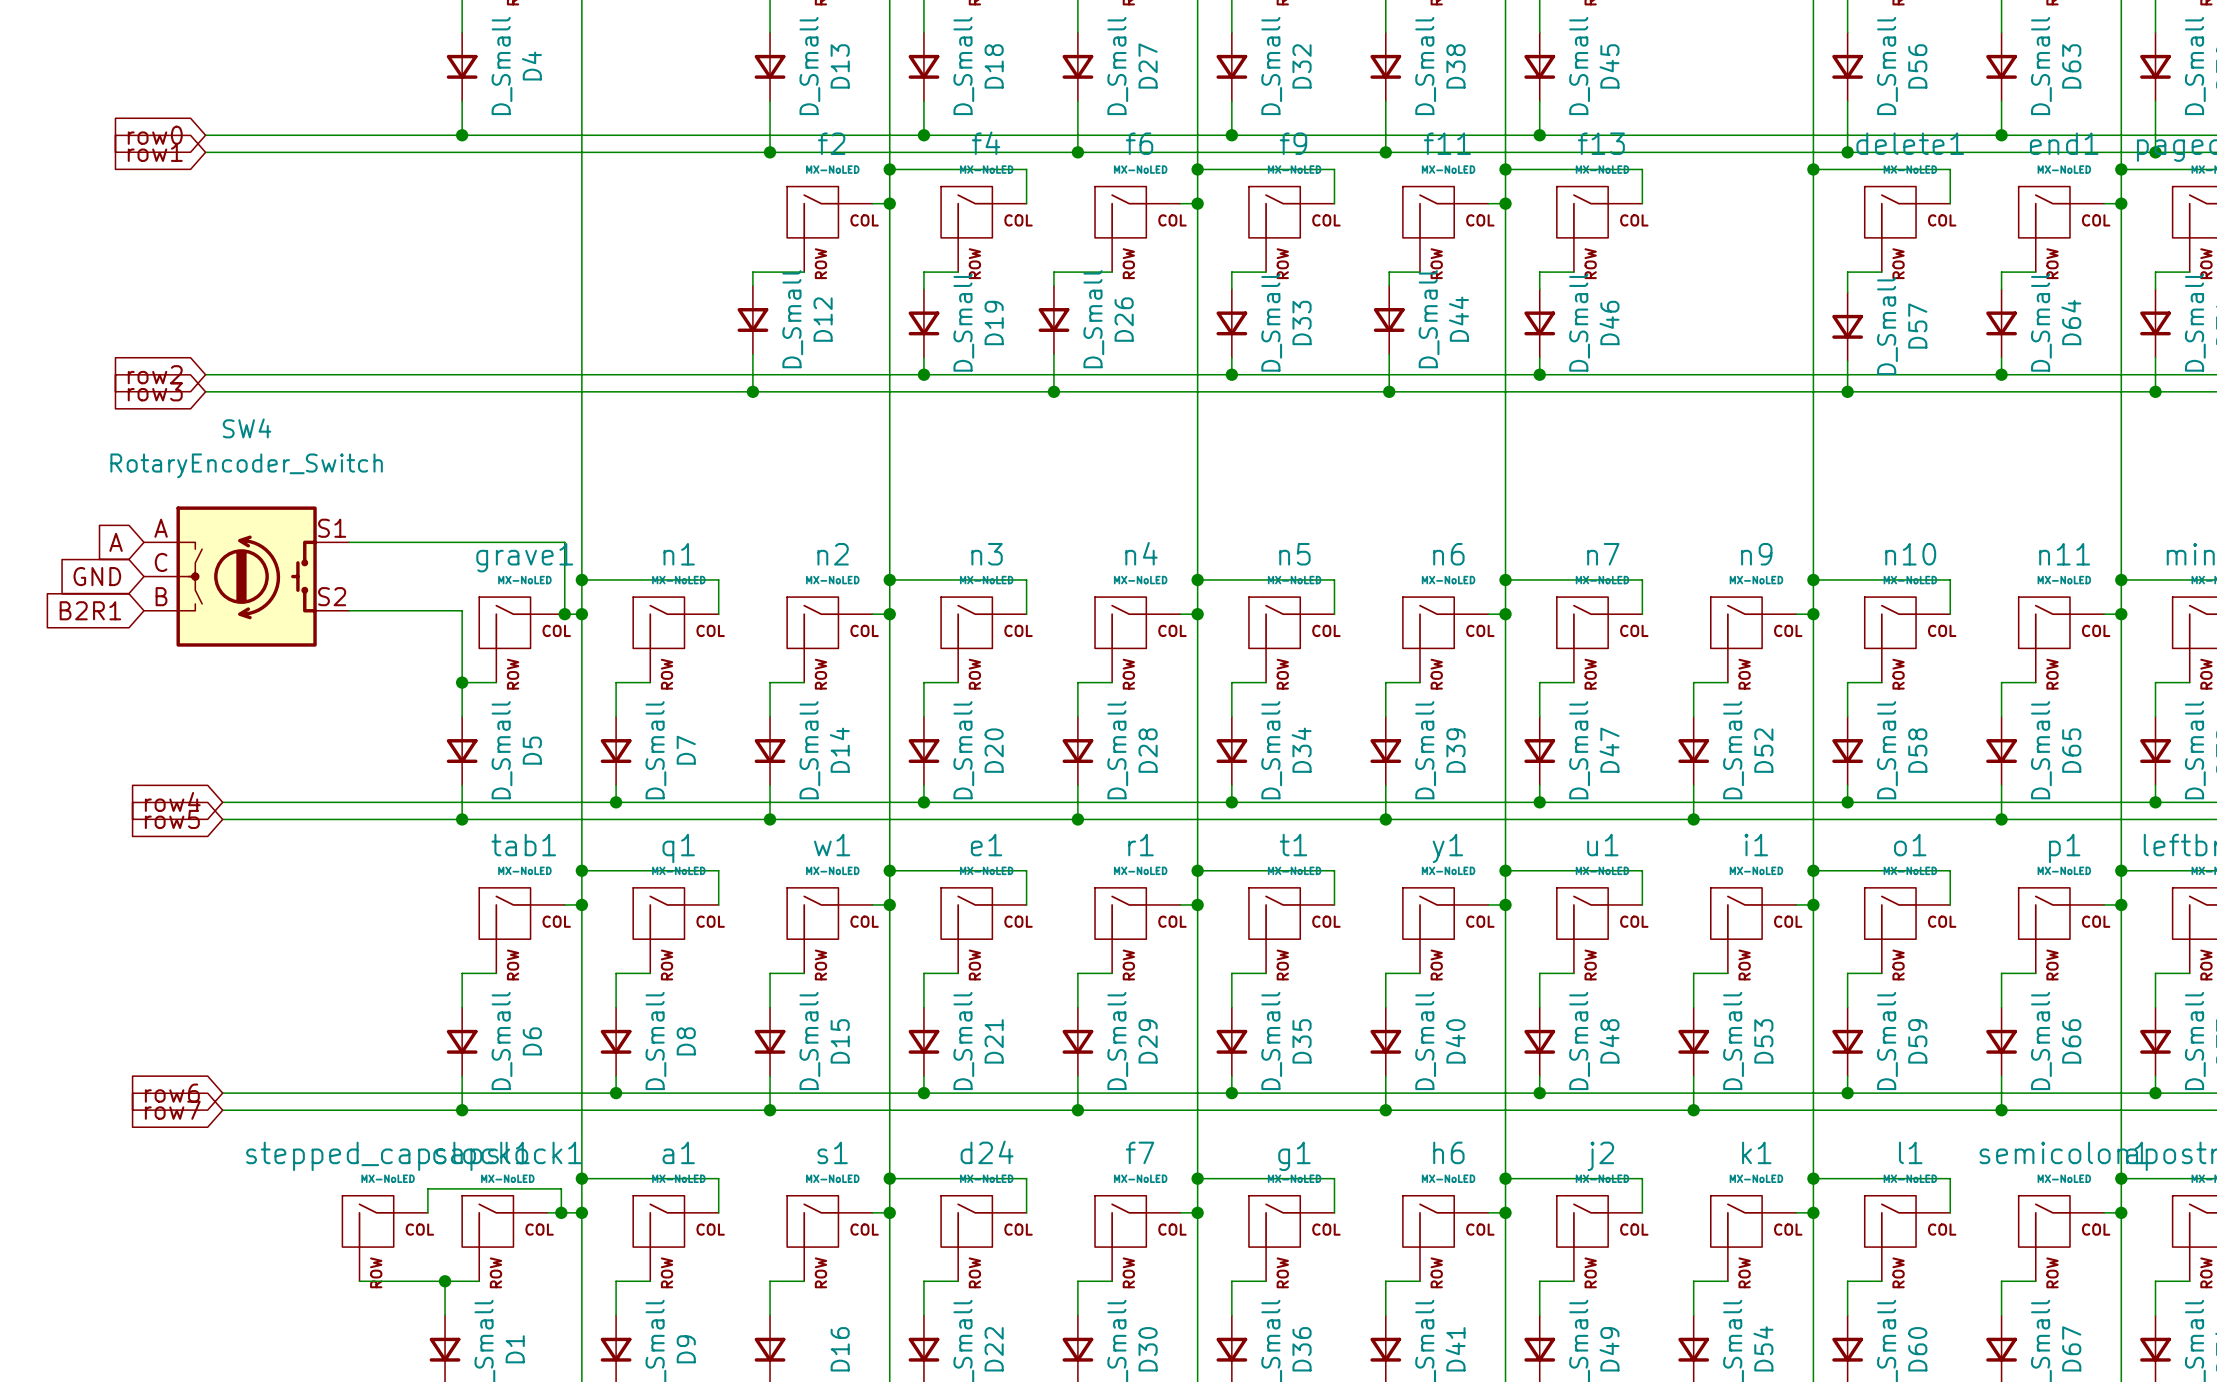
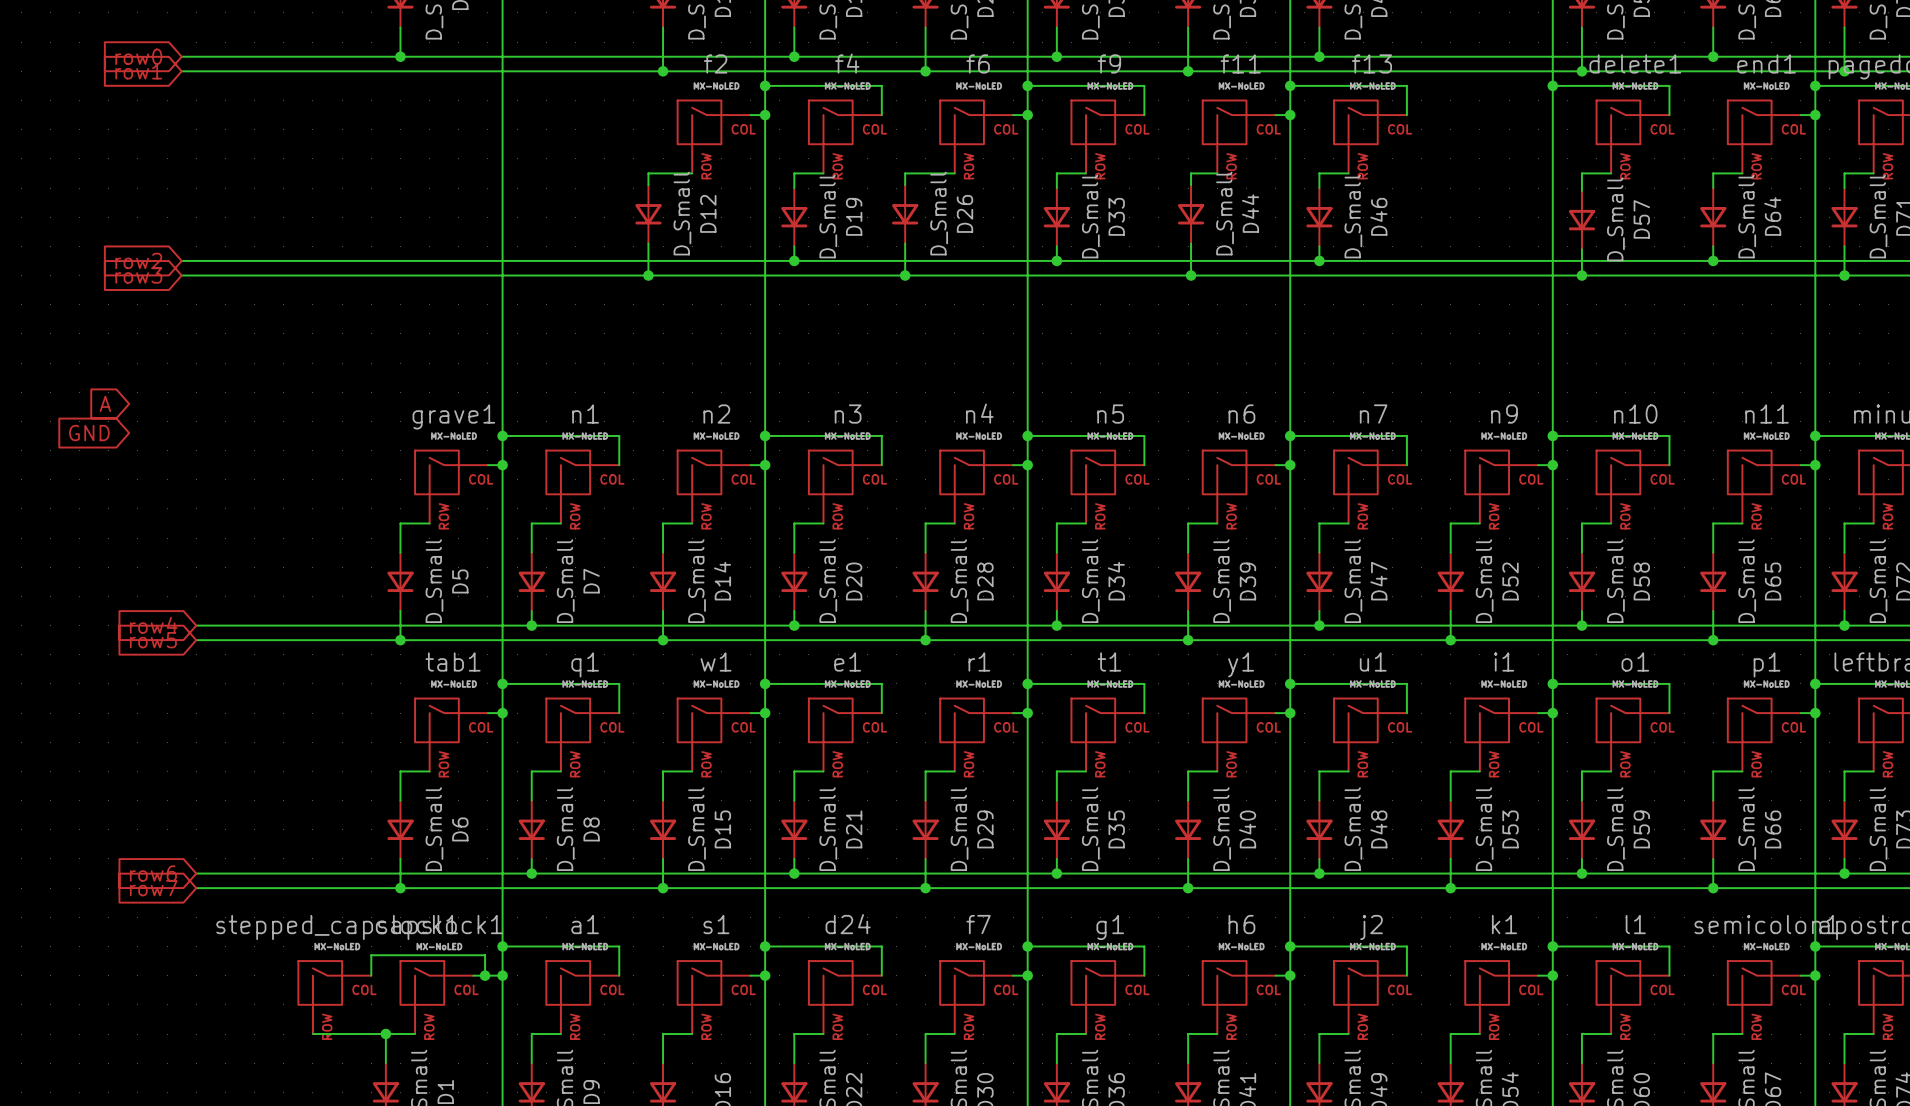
wire: (349, 542) (564, 542) (564, 614) -> none
SW4: RotaryEncoder_Switch (246, 576) -> none
global label: B2R1 (90, 610) -> none
wire: (349, 610) (462, 610) (462, 682) -> none
junction: (564, 614) -> none
junction: (462, 682) -> none

